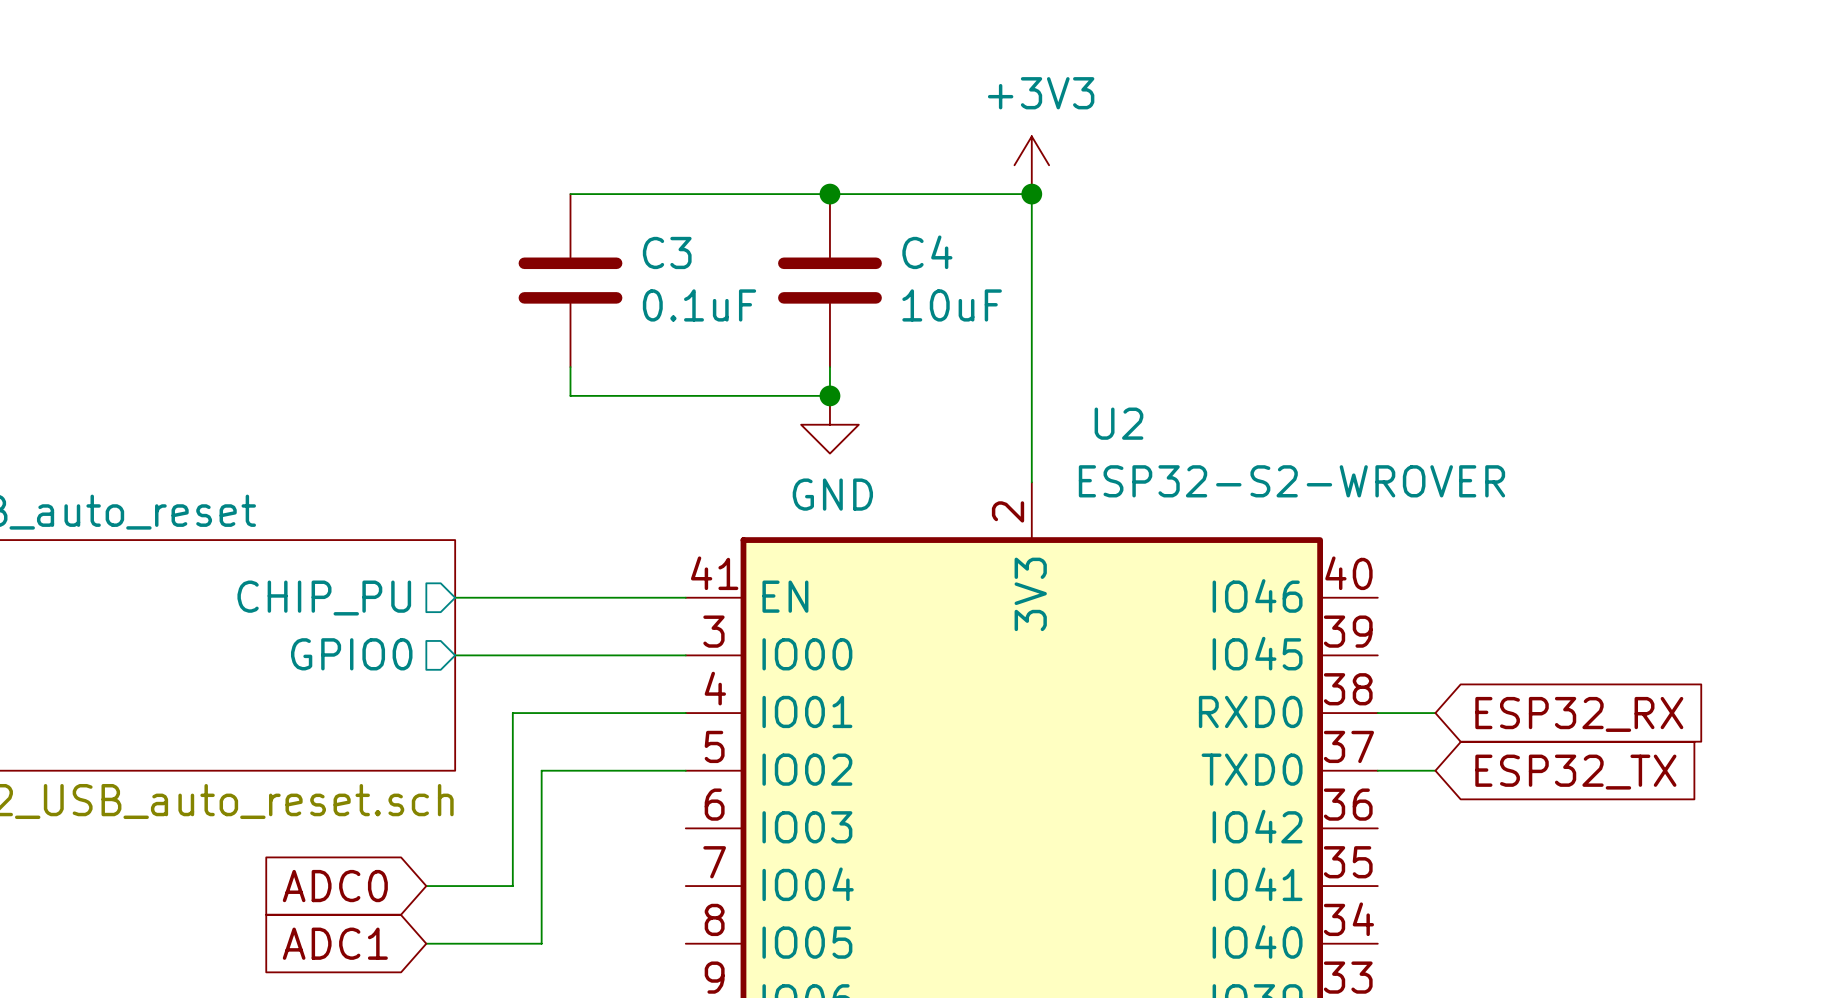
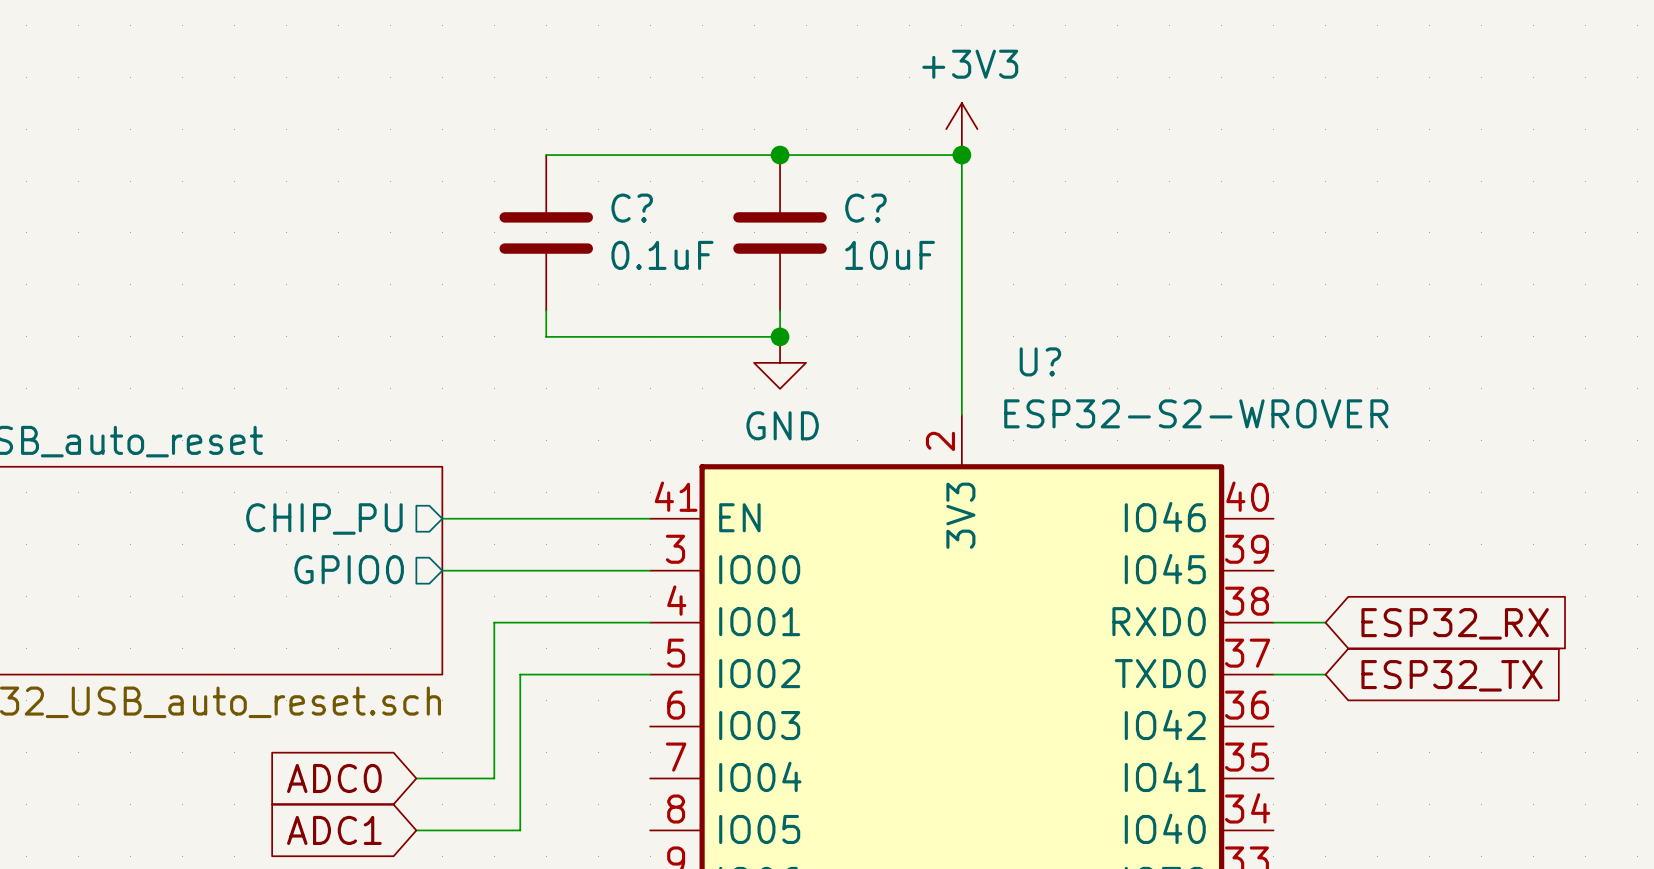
C3 name: C3 (667, 252) -> C? (632, 208)
C4 name: C4 (927, 252) -> C? (865, 208)
U2 name: U2 (1118, 423) -> U? (1040, 361)

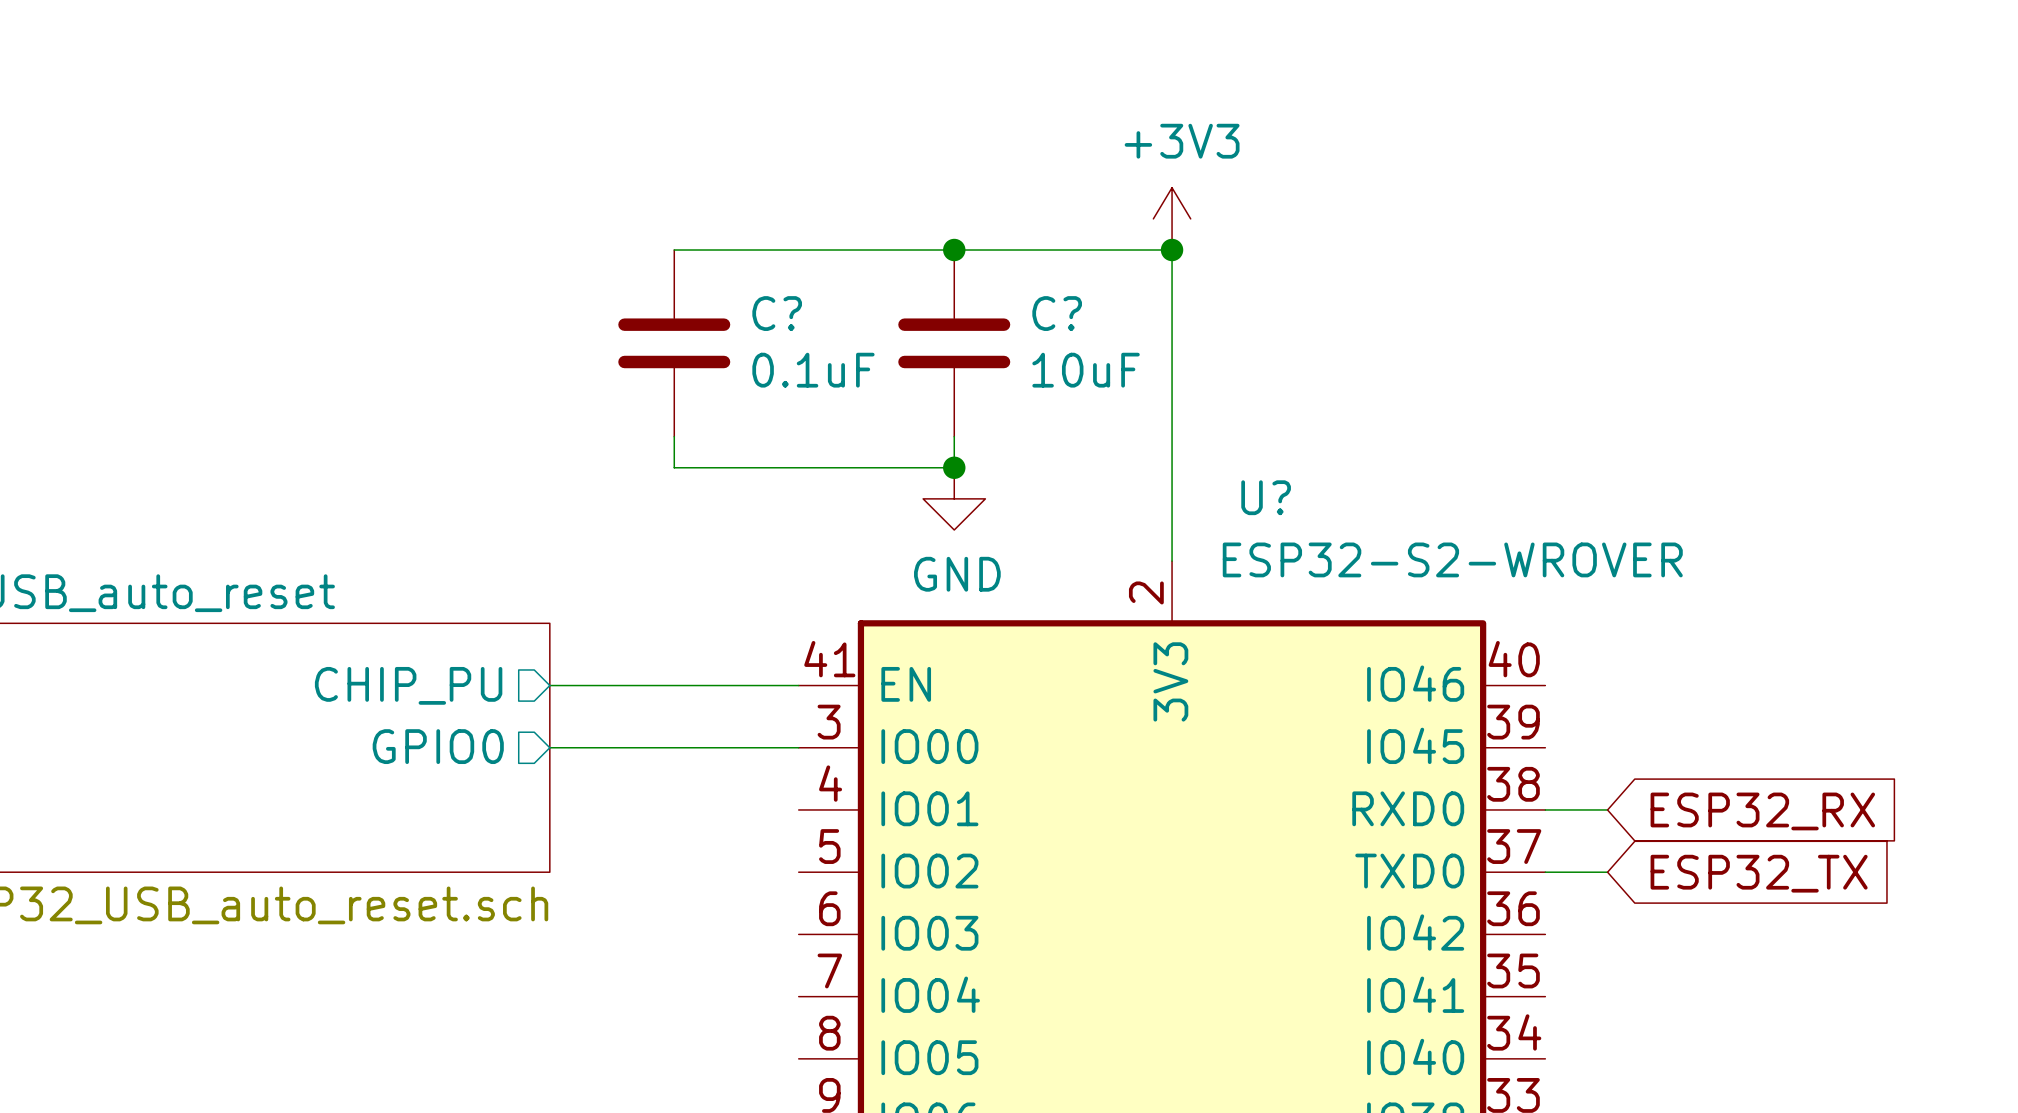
wire: (650, 622) (494, 622) (494, 778) (416, 778) -> none
wire: (650, 674) (520, 674) (520, 830) (416, 830) -> none
global label: ADC0 (334, 778) -> none
global label: ADC1 (334, 830) -> none

